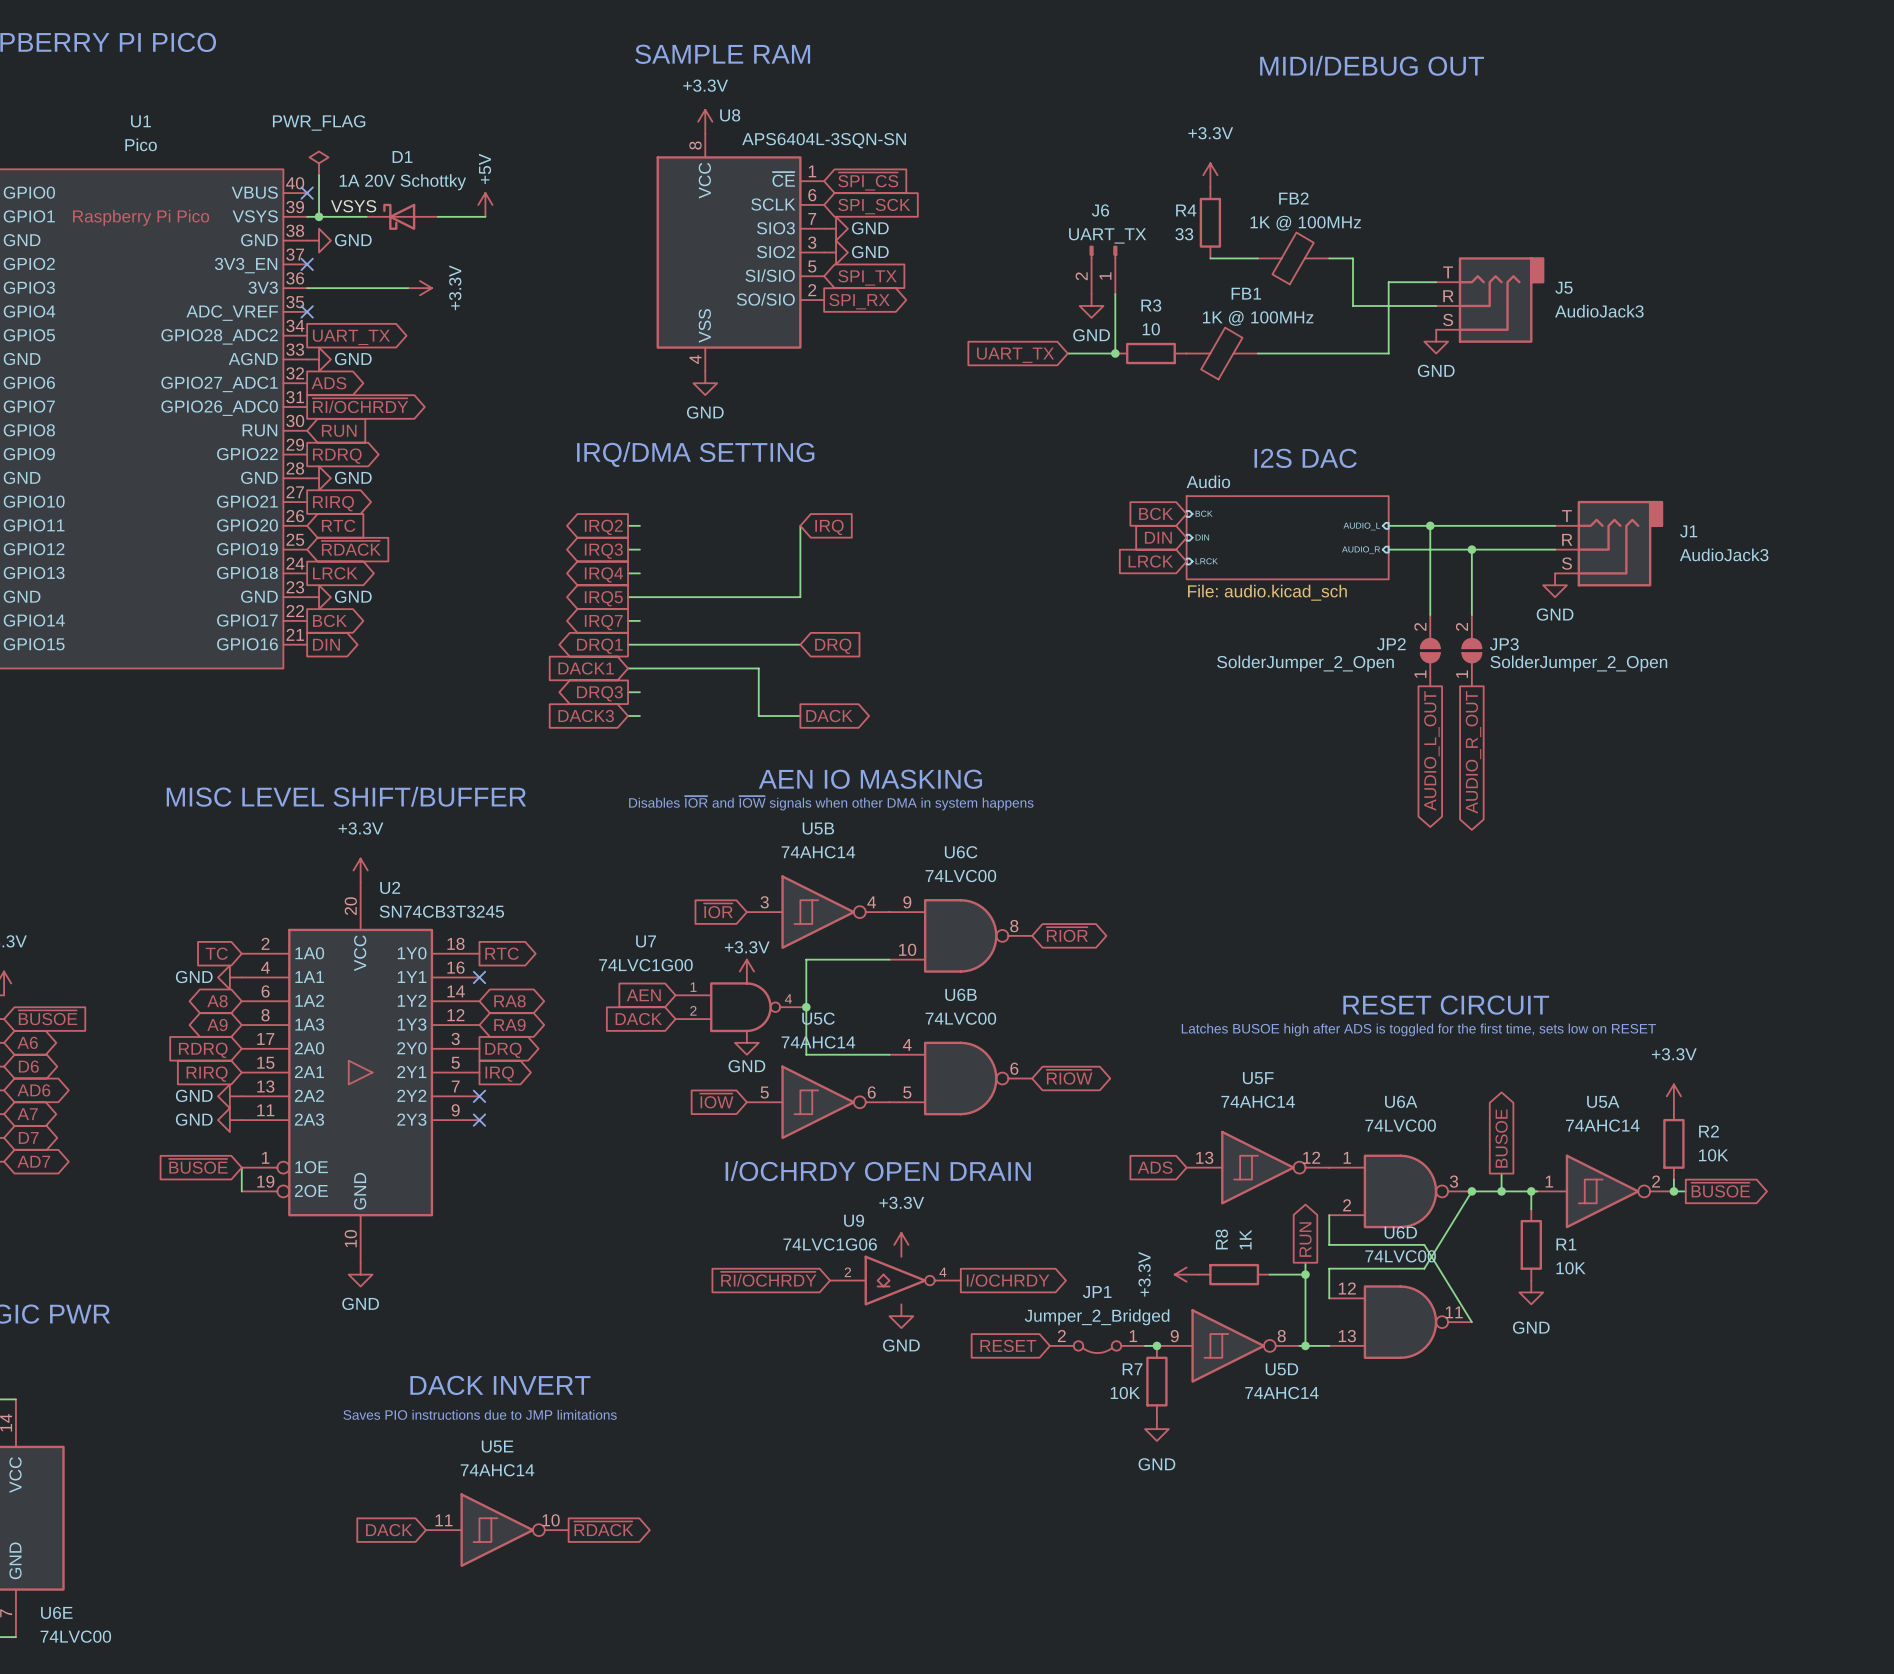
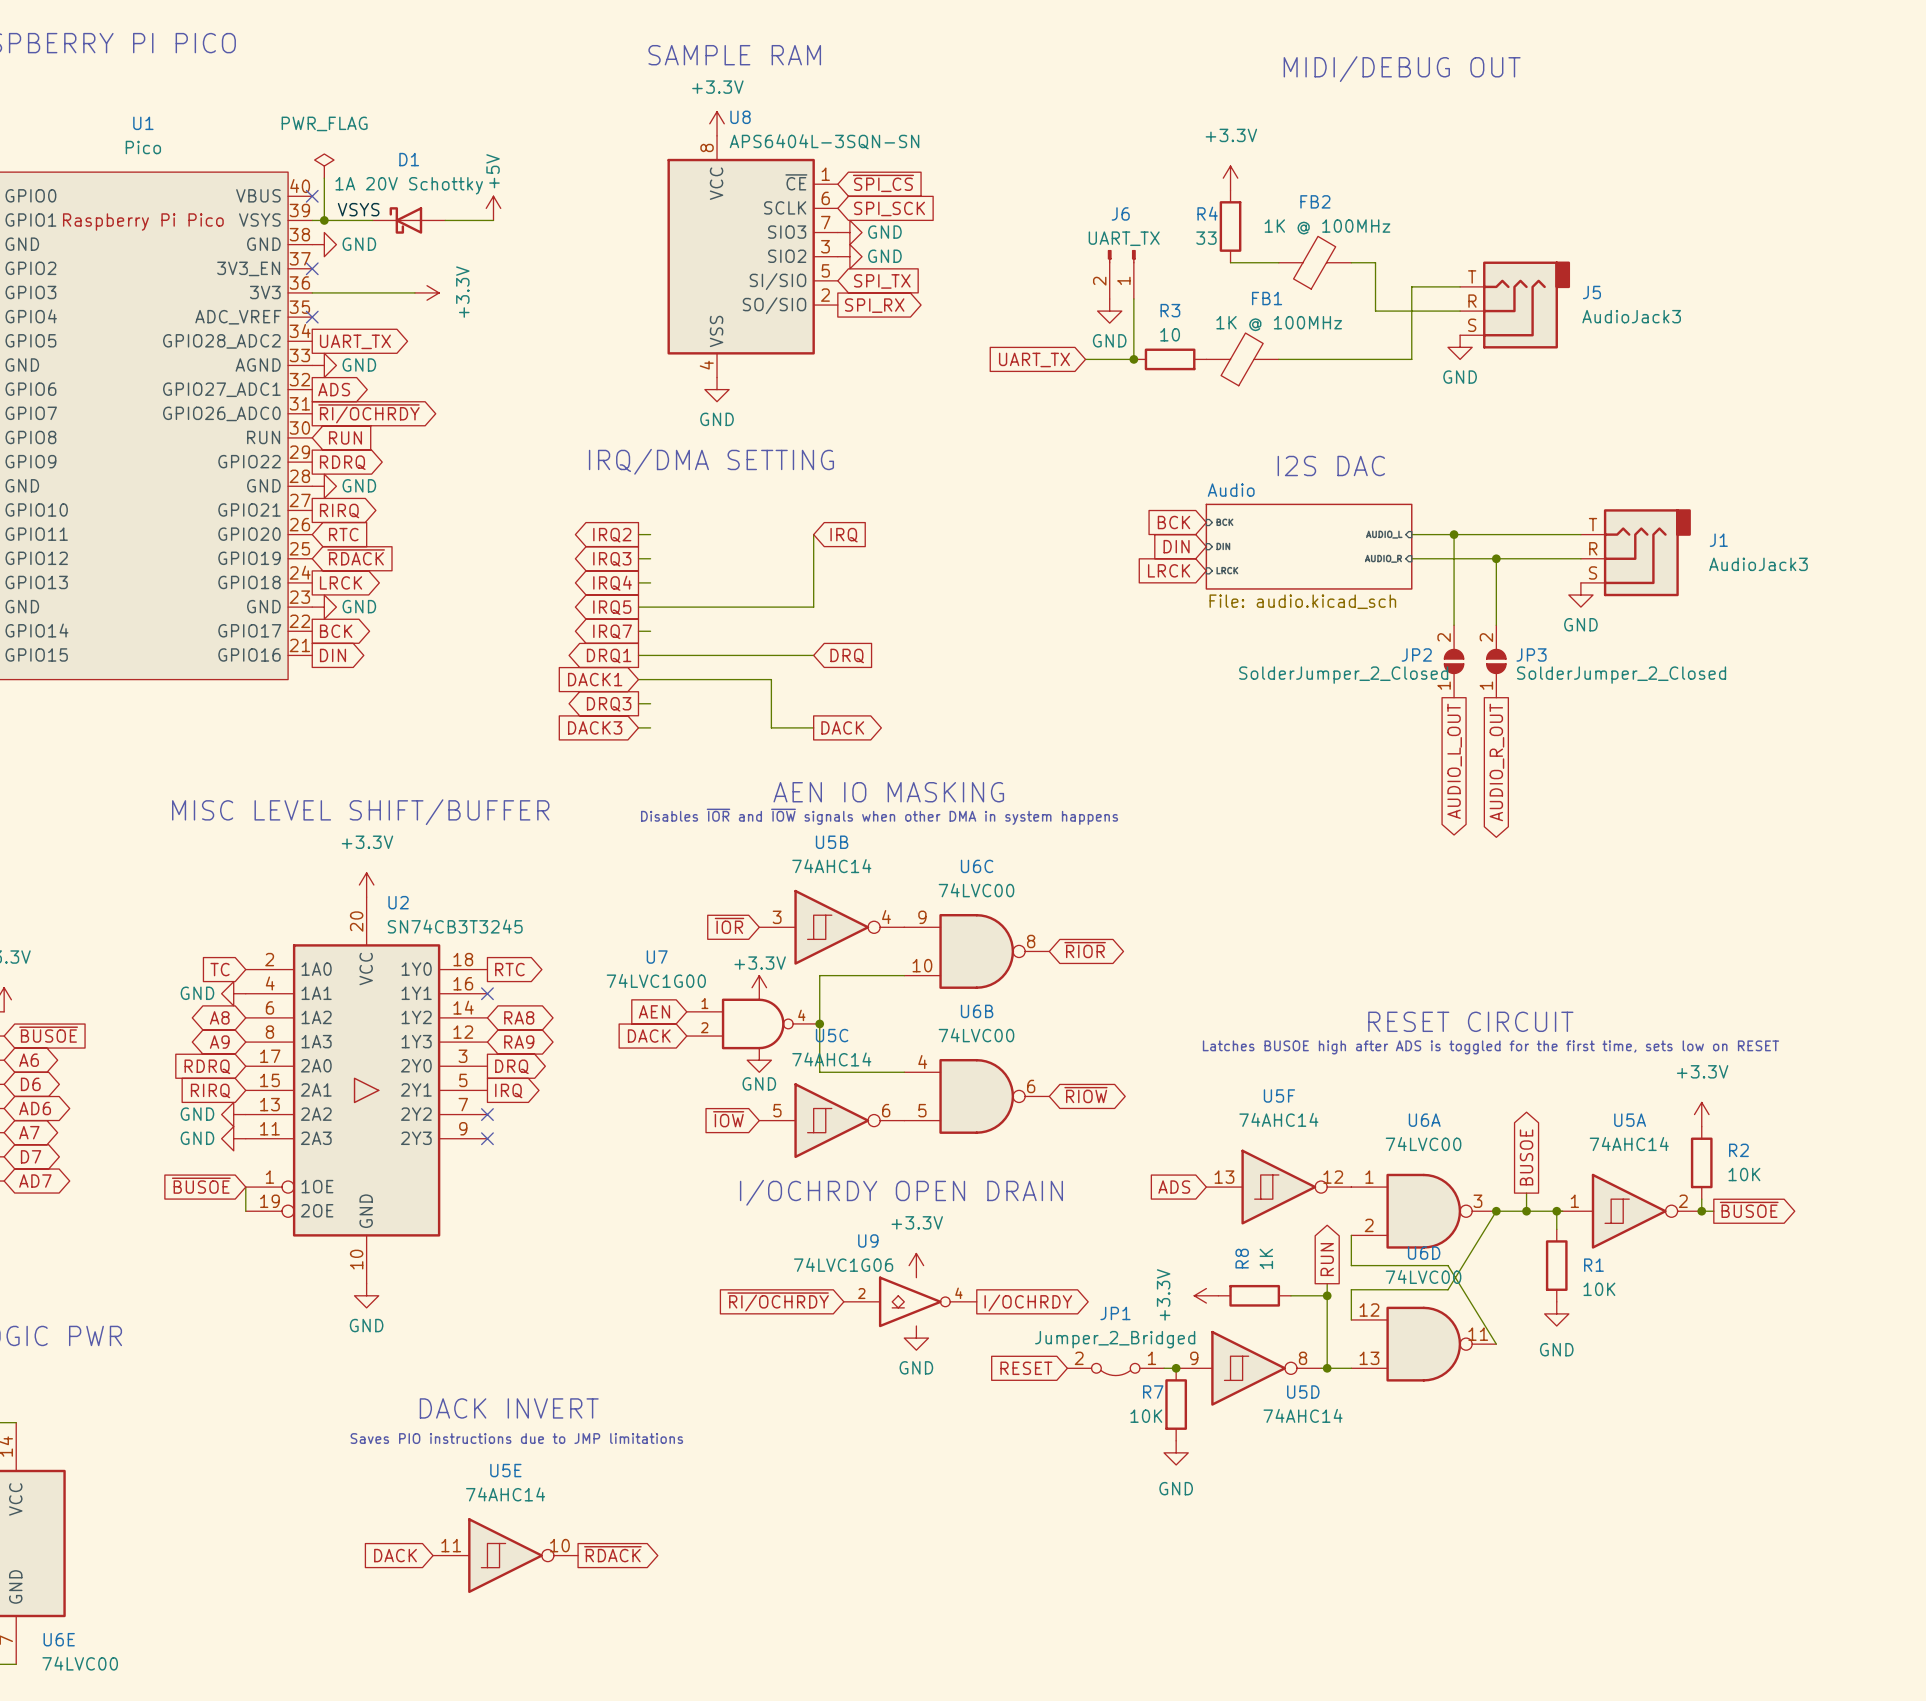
JP2 value: SolderJumper_2_Open (1305, 663) -> SolderJumper_2_Closed (1343, 675)
JP3 value: SolderJumper_2_Open (1578, 663) -> SolderJumper_2_Closed (1621, 675)

